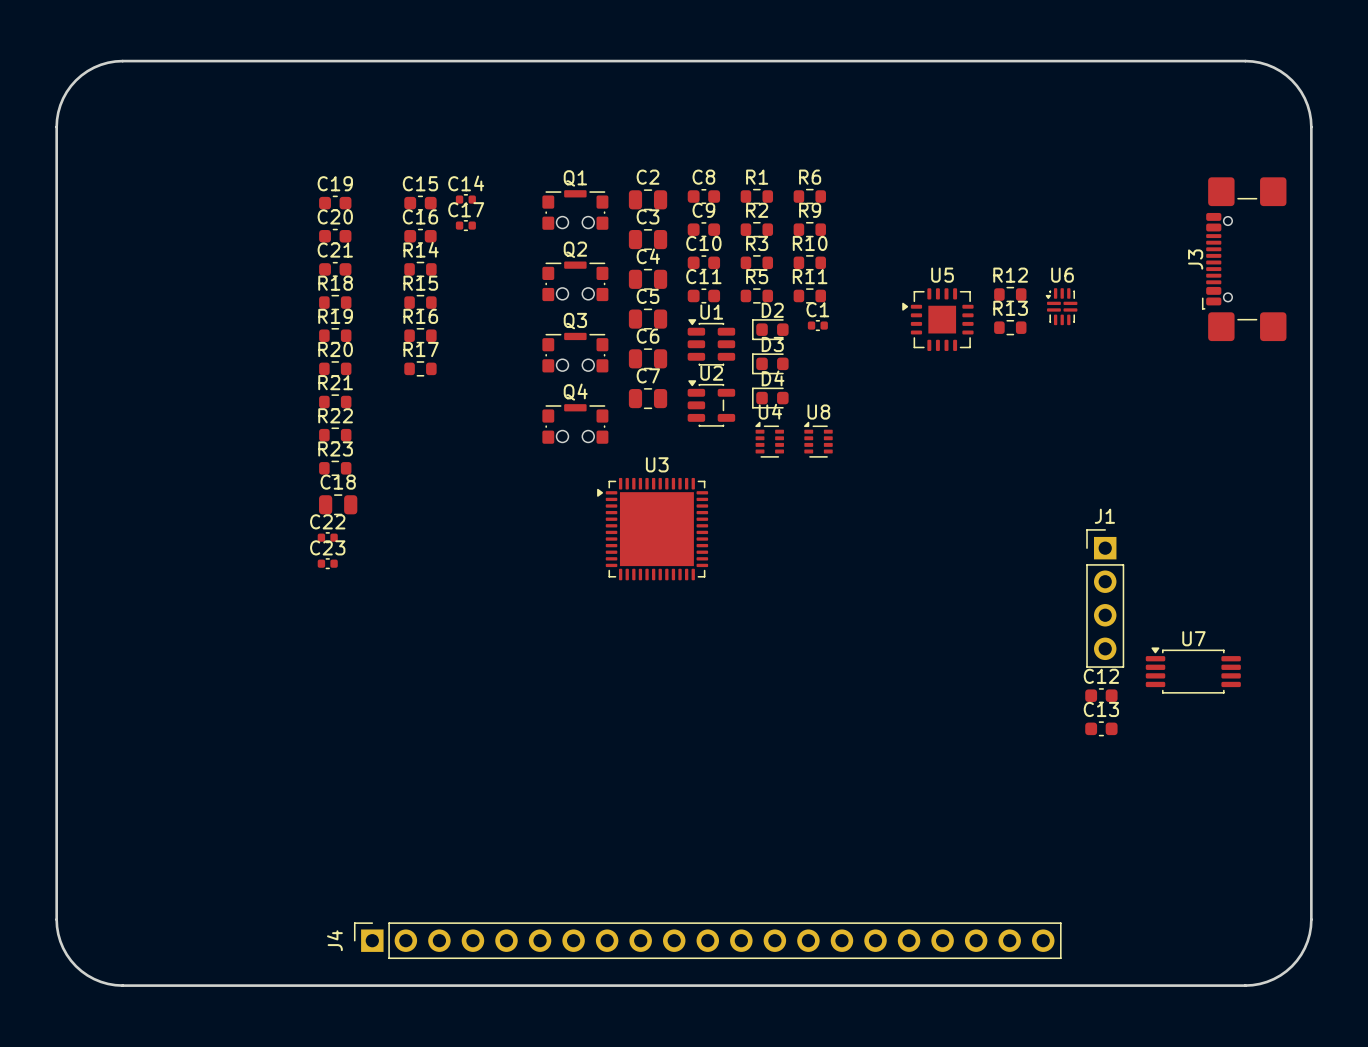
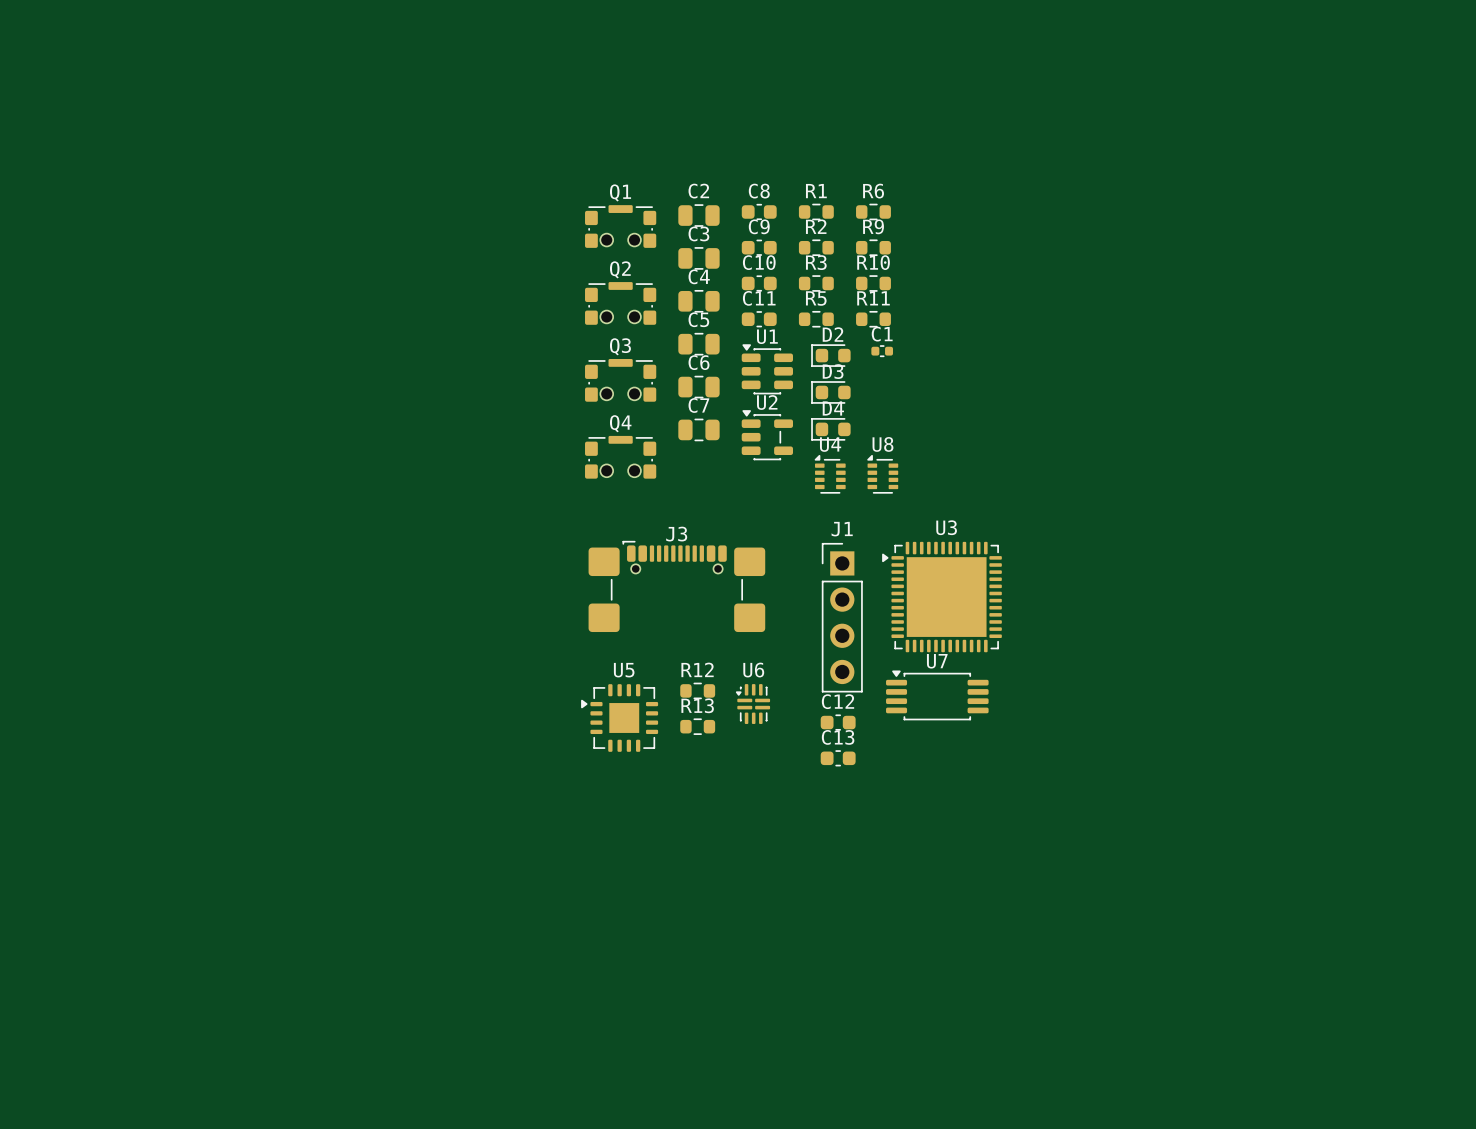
board edge: (122, 61) (1245, 61) (1267, 64) (1286, 75) (1296, 85) (1304, 98) (1309, 112) (1311, 127) (1311, 919) (1307, 941) (1296, 960) (1286, 971) (1273, 979) (1260, 983) (1245, 985) (122, 985) (100, 981) (81, 971) (71, 960) (63, 948) (58, 934) (56, 919) (56, 127) (60, 105) (66, 91) (76, 80) (87, 71) (100, 64) (122, 61) -> none
C14: (465, 199) -> none
C19: (335, 203) -> none
C15: (420, 203) -> none
C17: (465, 225) -> none
C20: (335, 236) -> none
C16: (420, 236) -> none
J3 rotation: 0° (1244, 259) -> 90° clockwise (676, 586)
J3 position: (1244, 259) -> (676, 586)
C21: (335, 269) -> none
R14: (420, 269) -> none
R12 position: (1010, 294) -> (697, 690)
R18: (335, 302) -> none
R15: (420, 302) -> none
U6 position: (1061, 306) -> (752, 704)
U5 position: (937, 319) -> (619, 717)
R13 position: (1010, 327) -> (697, 726)
R19: (335, 335) -> none
R16: (420, 335) -> none
R20: (335, 368) -> none
R17: (420, 368) -> none
R21: (335, 402) -> none
R22: (335, 435) -> none
R23: (335, 468) -> none
C18: (338, 504) -> none
U3 position: (652, 529) -> (941, 597)
C22: (327, 537) -> none
C23: (327, 563) -> none
J1 position: (1105, 598) -> (842, 617)
U7 position: (1193, 670) -> (937, 695)
C12 position: (1101, 695) -> (838, 722)
C13 position: (1101, 728) -> (838, 758)
J4: (707, 940) -> none

